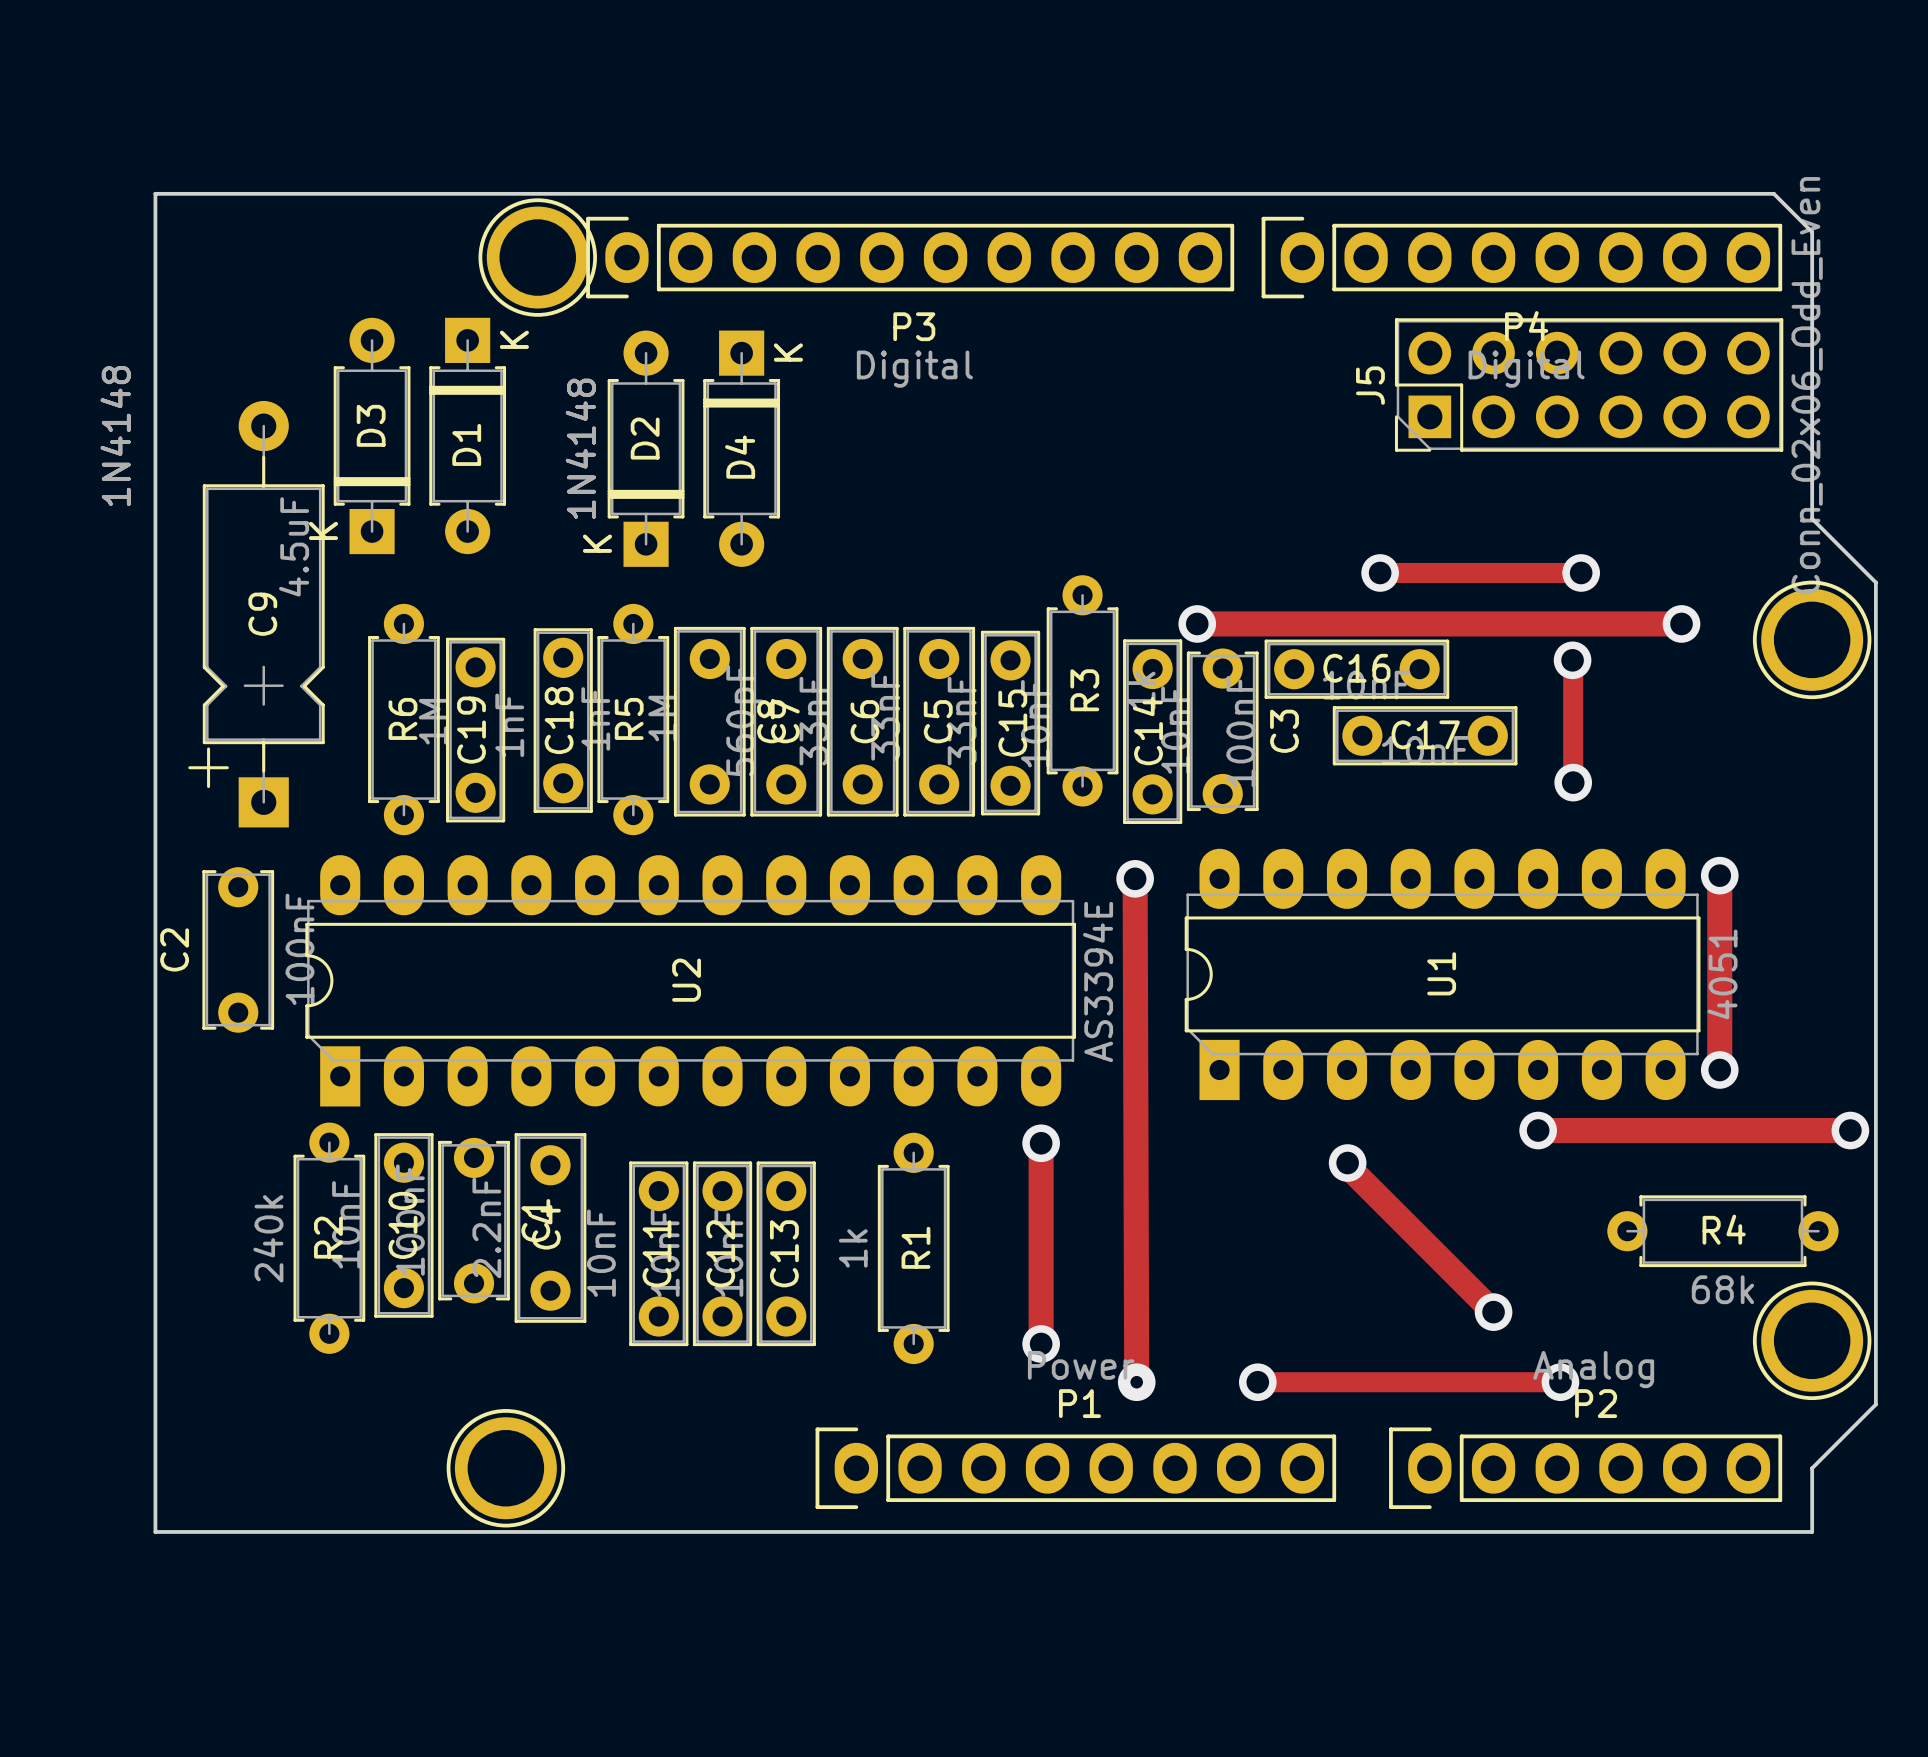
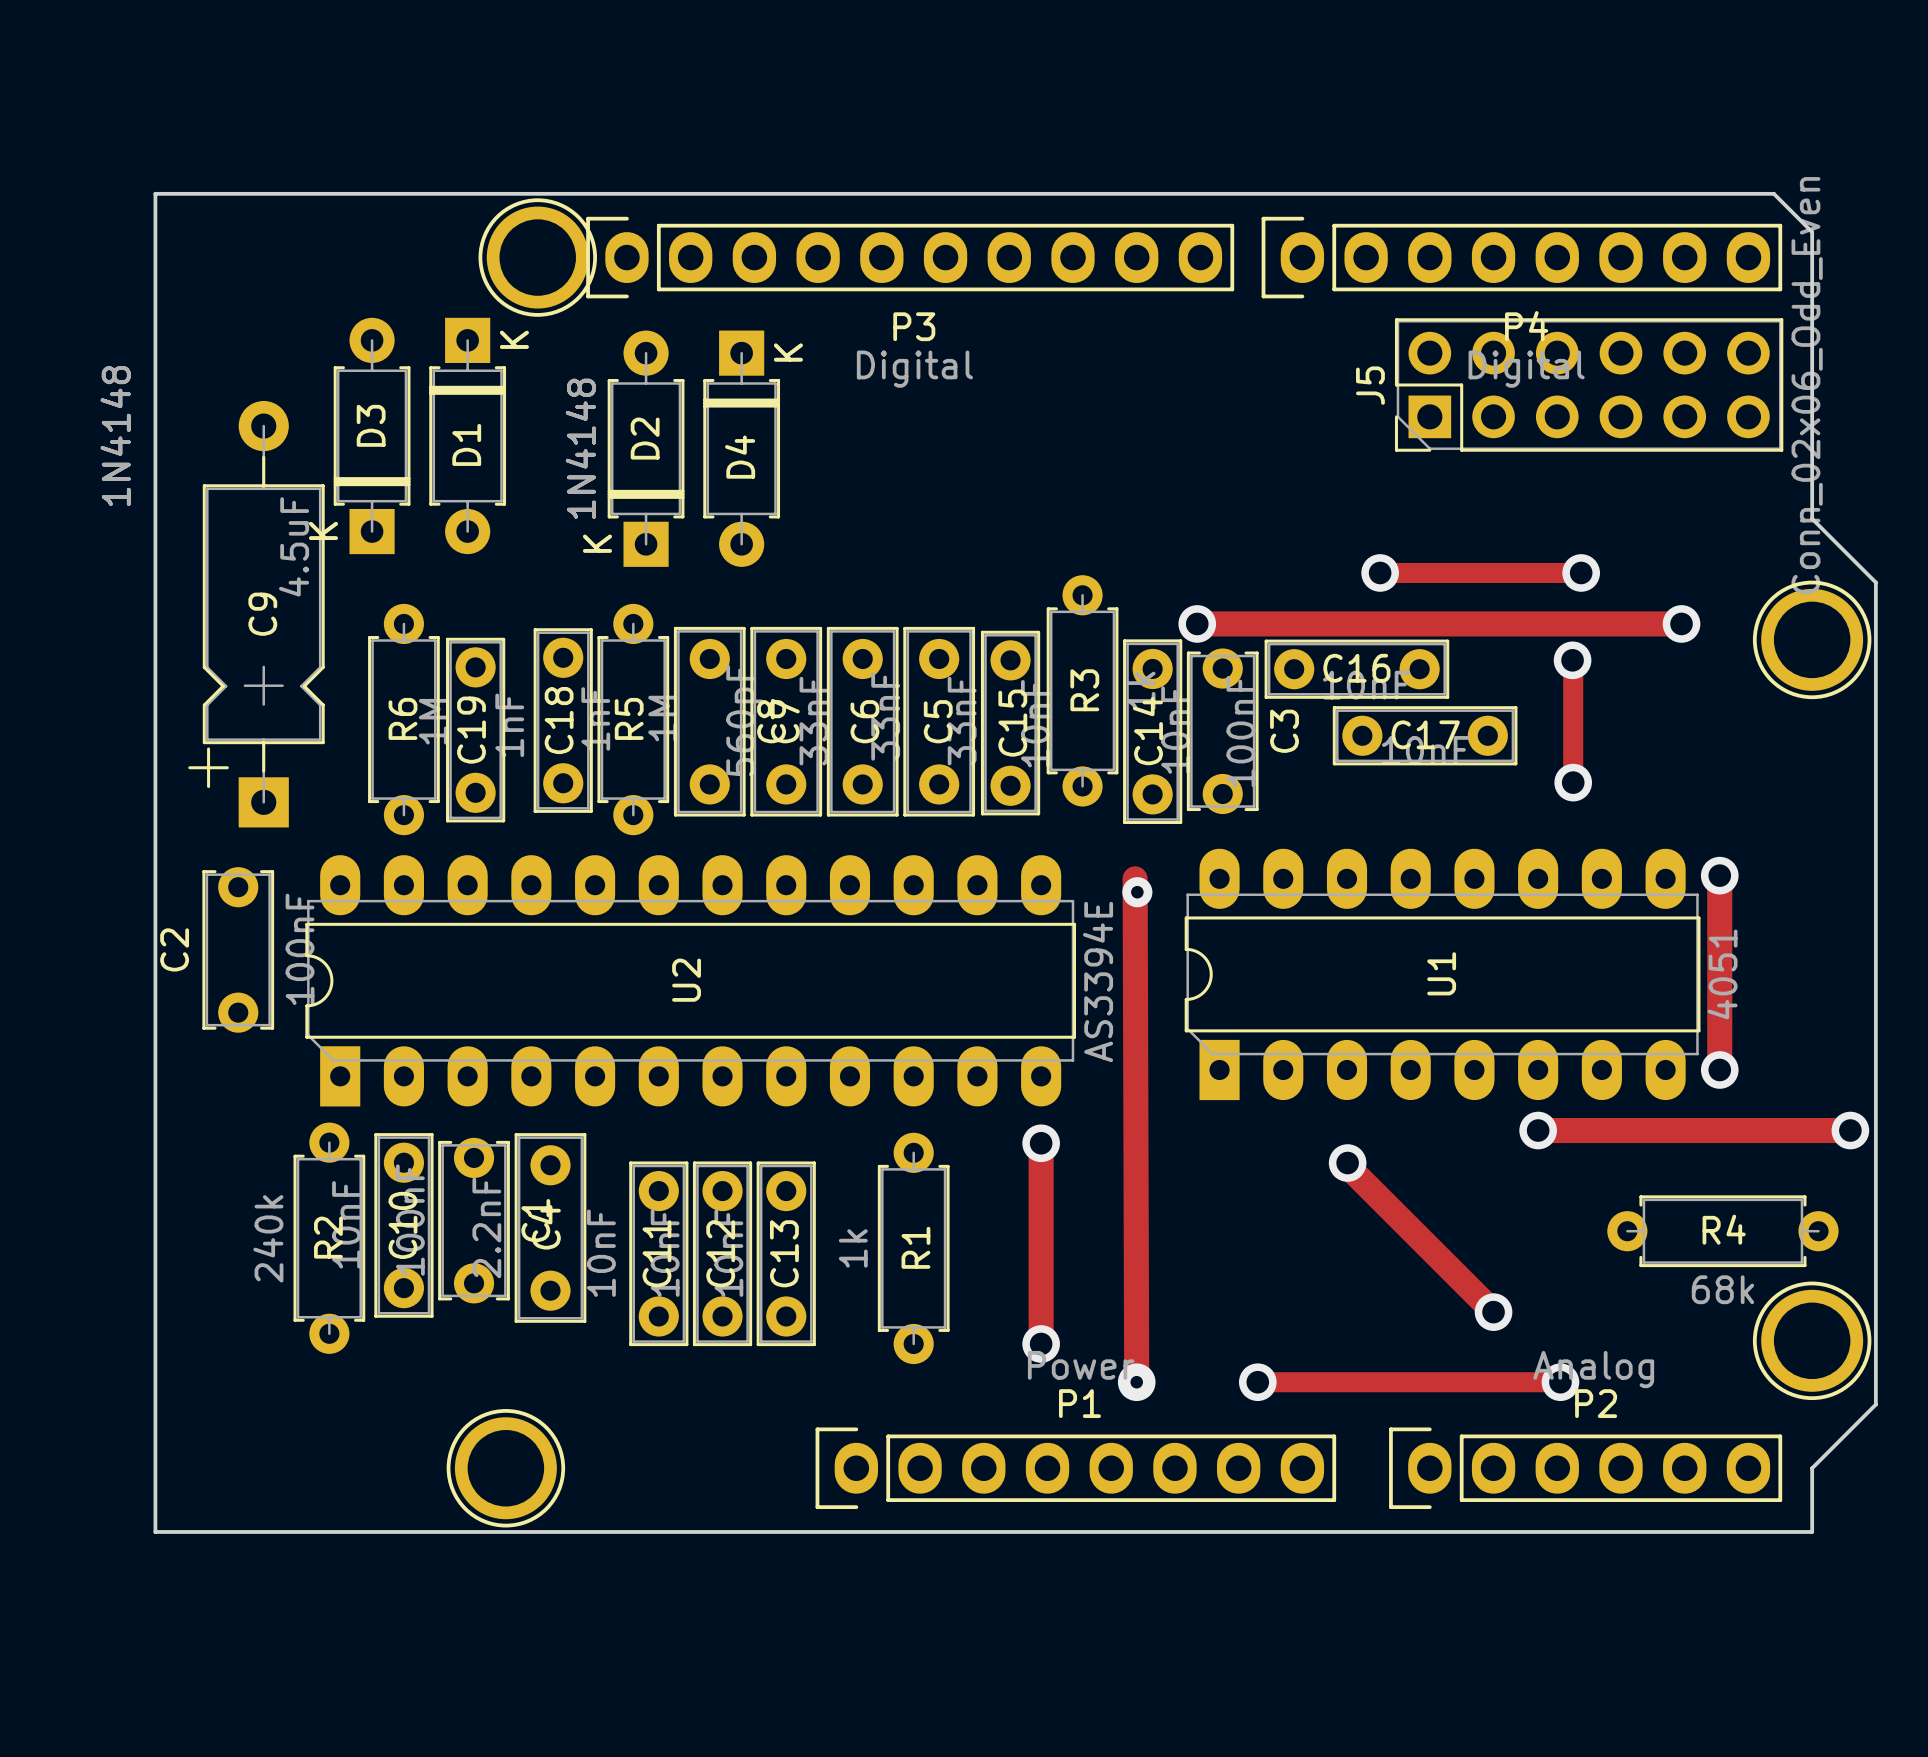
via size: [1116, 860, 1154, 898] -> [1122, 877, 1153, 908]

